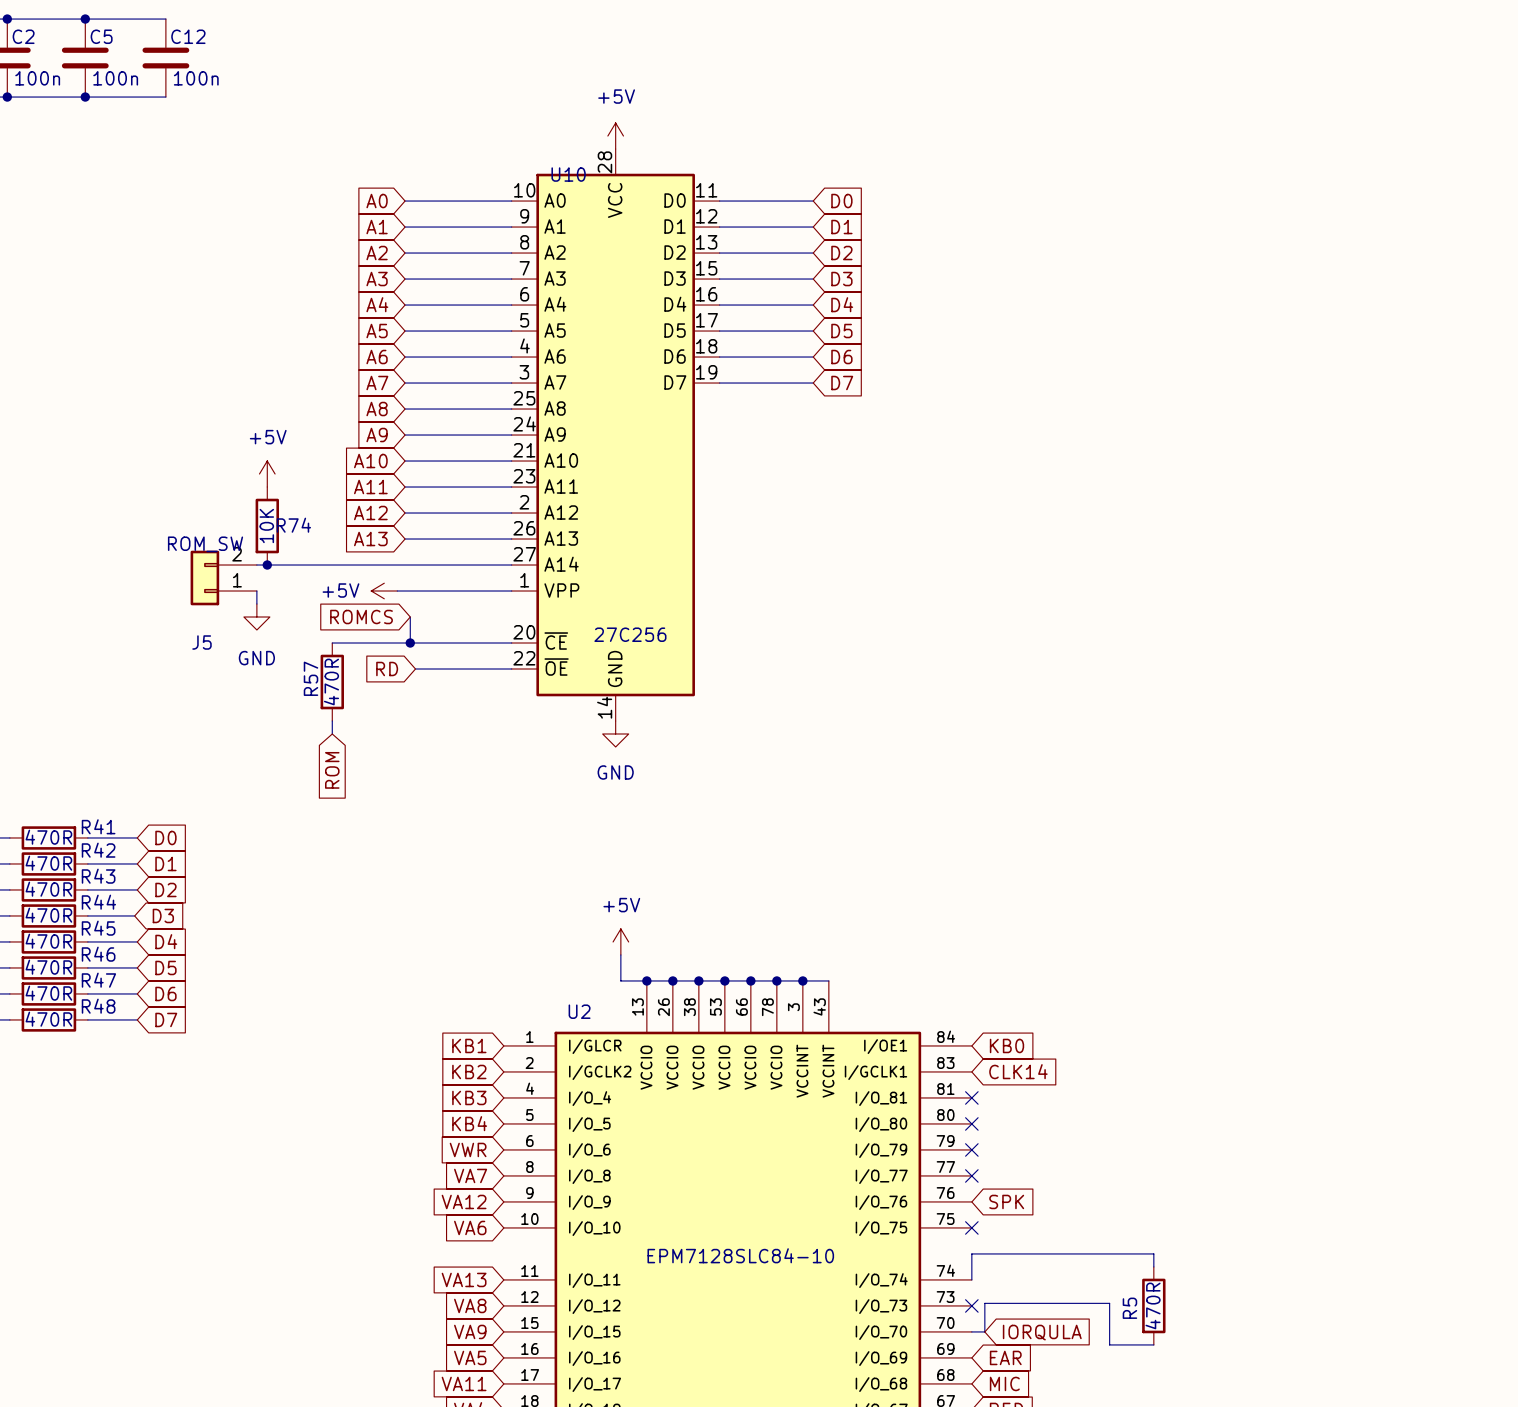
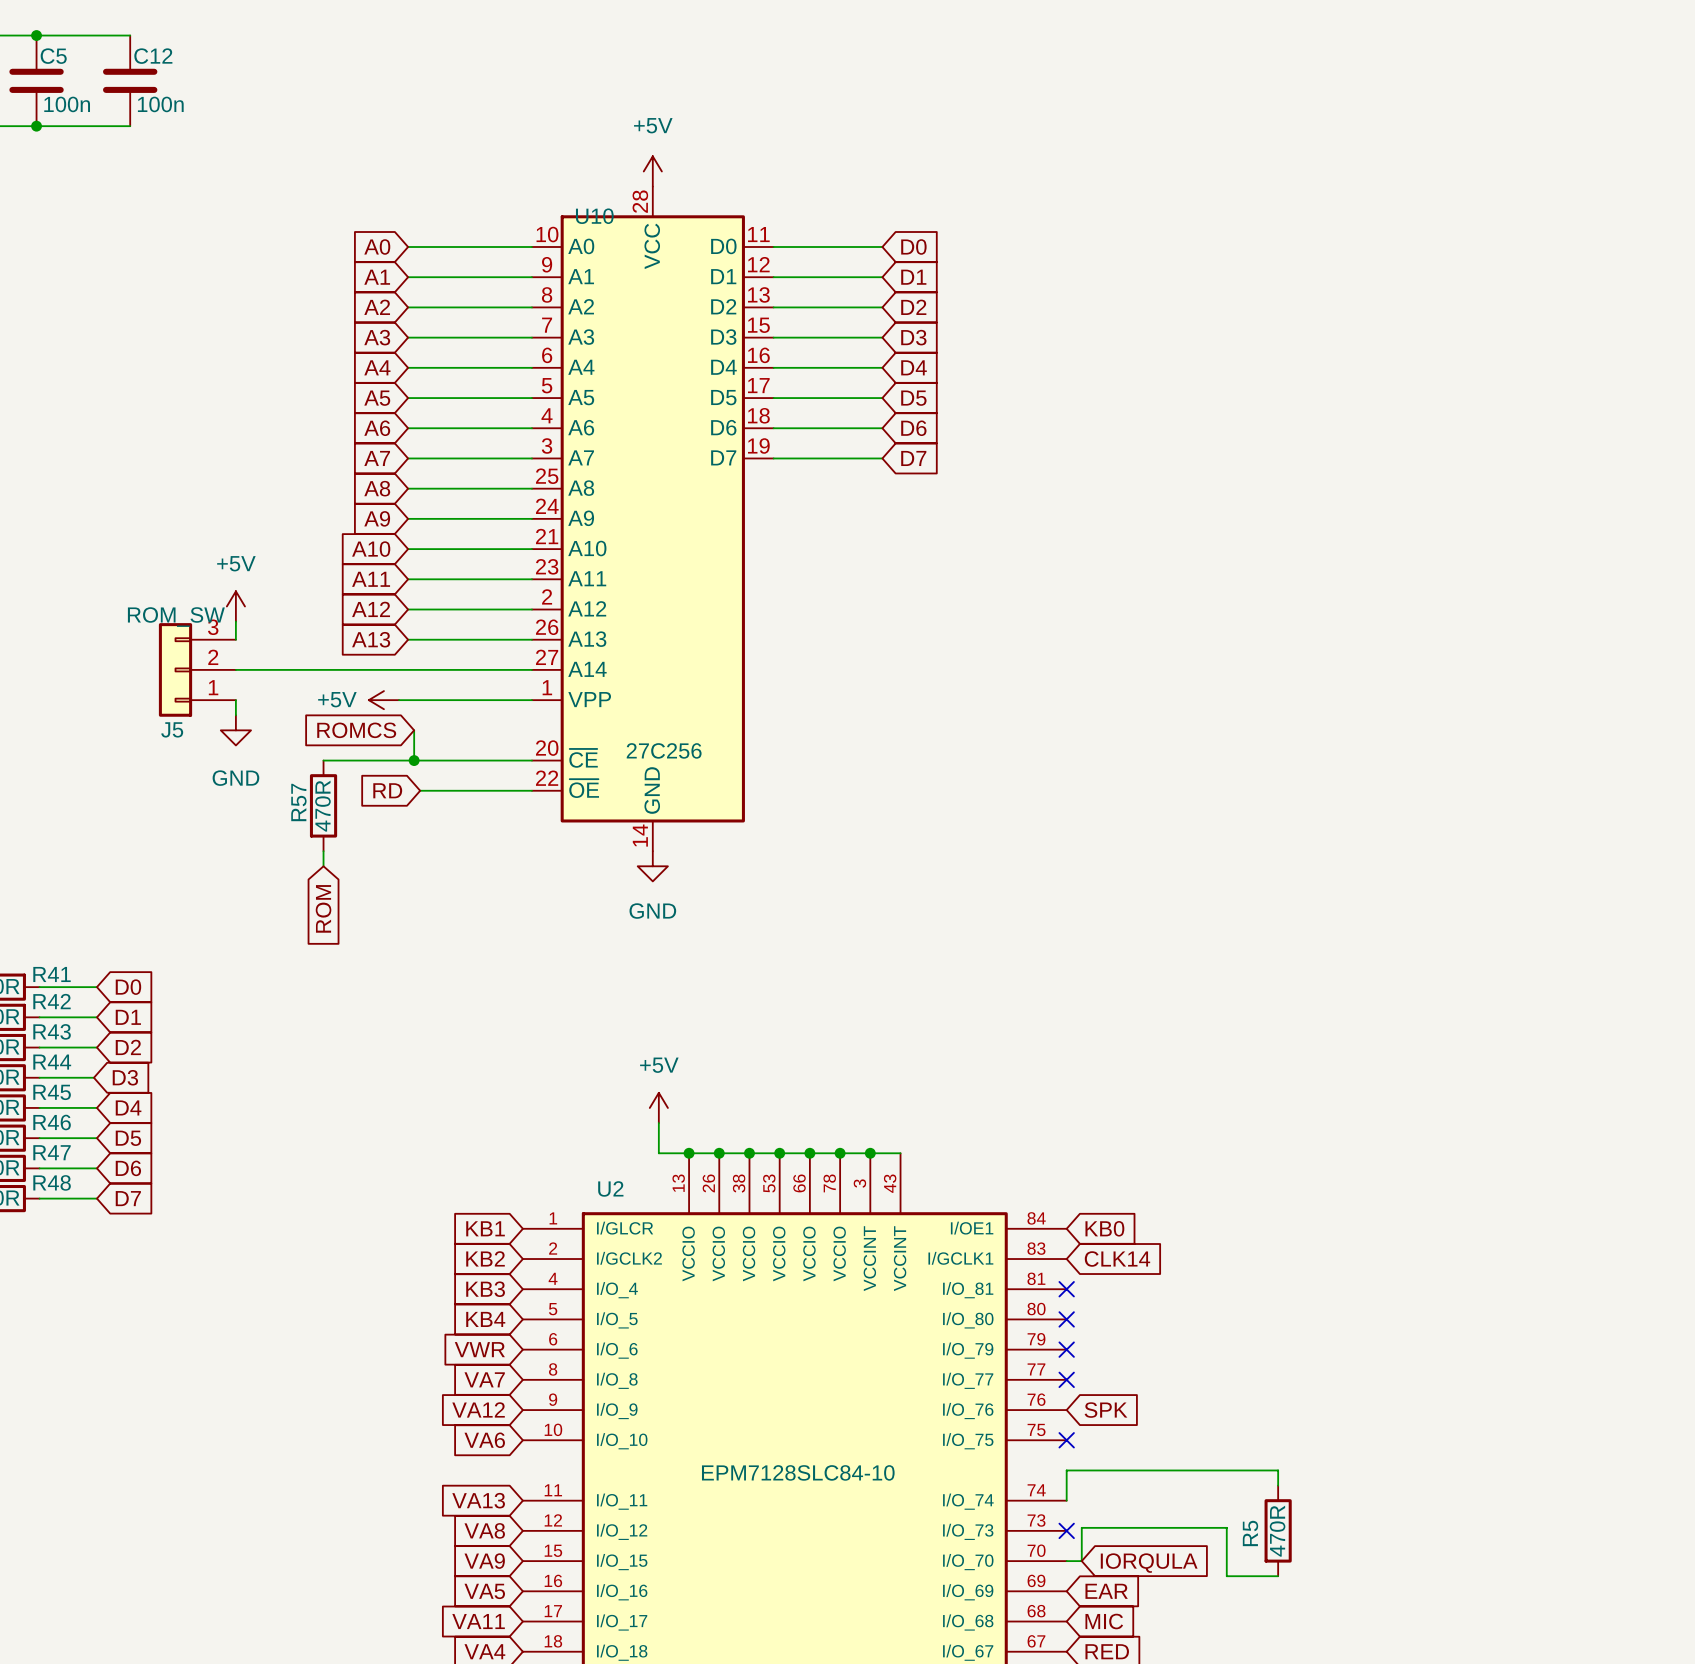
power symbol position: +5V (267, 474) -> +5V (235, 606)
R74: 10K (267, 526) -> none
J5 symbol: [190, 550, 257, 606] -> [158, 623, 236, 717]
junction: (267, 565) -> none

